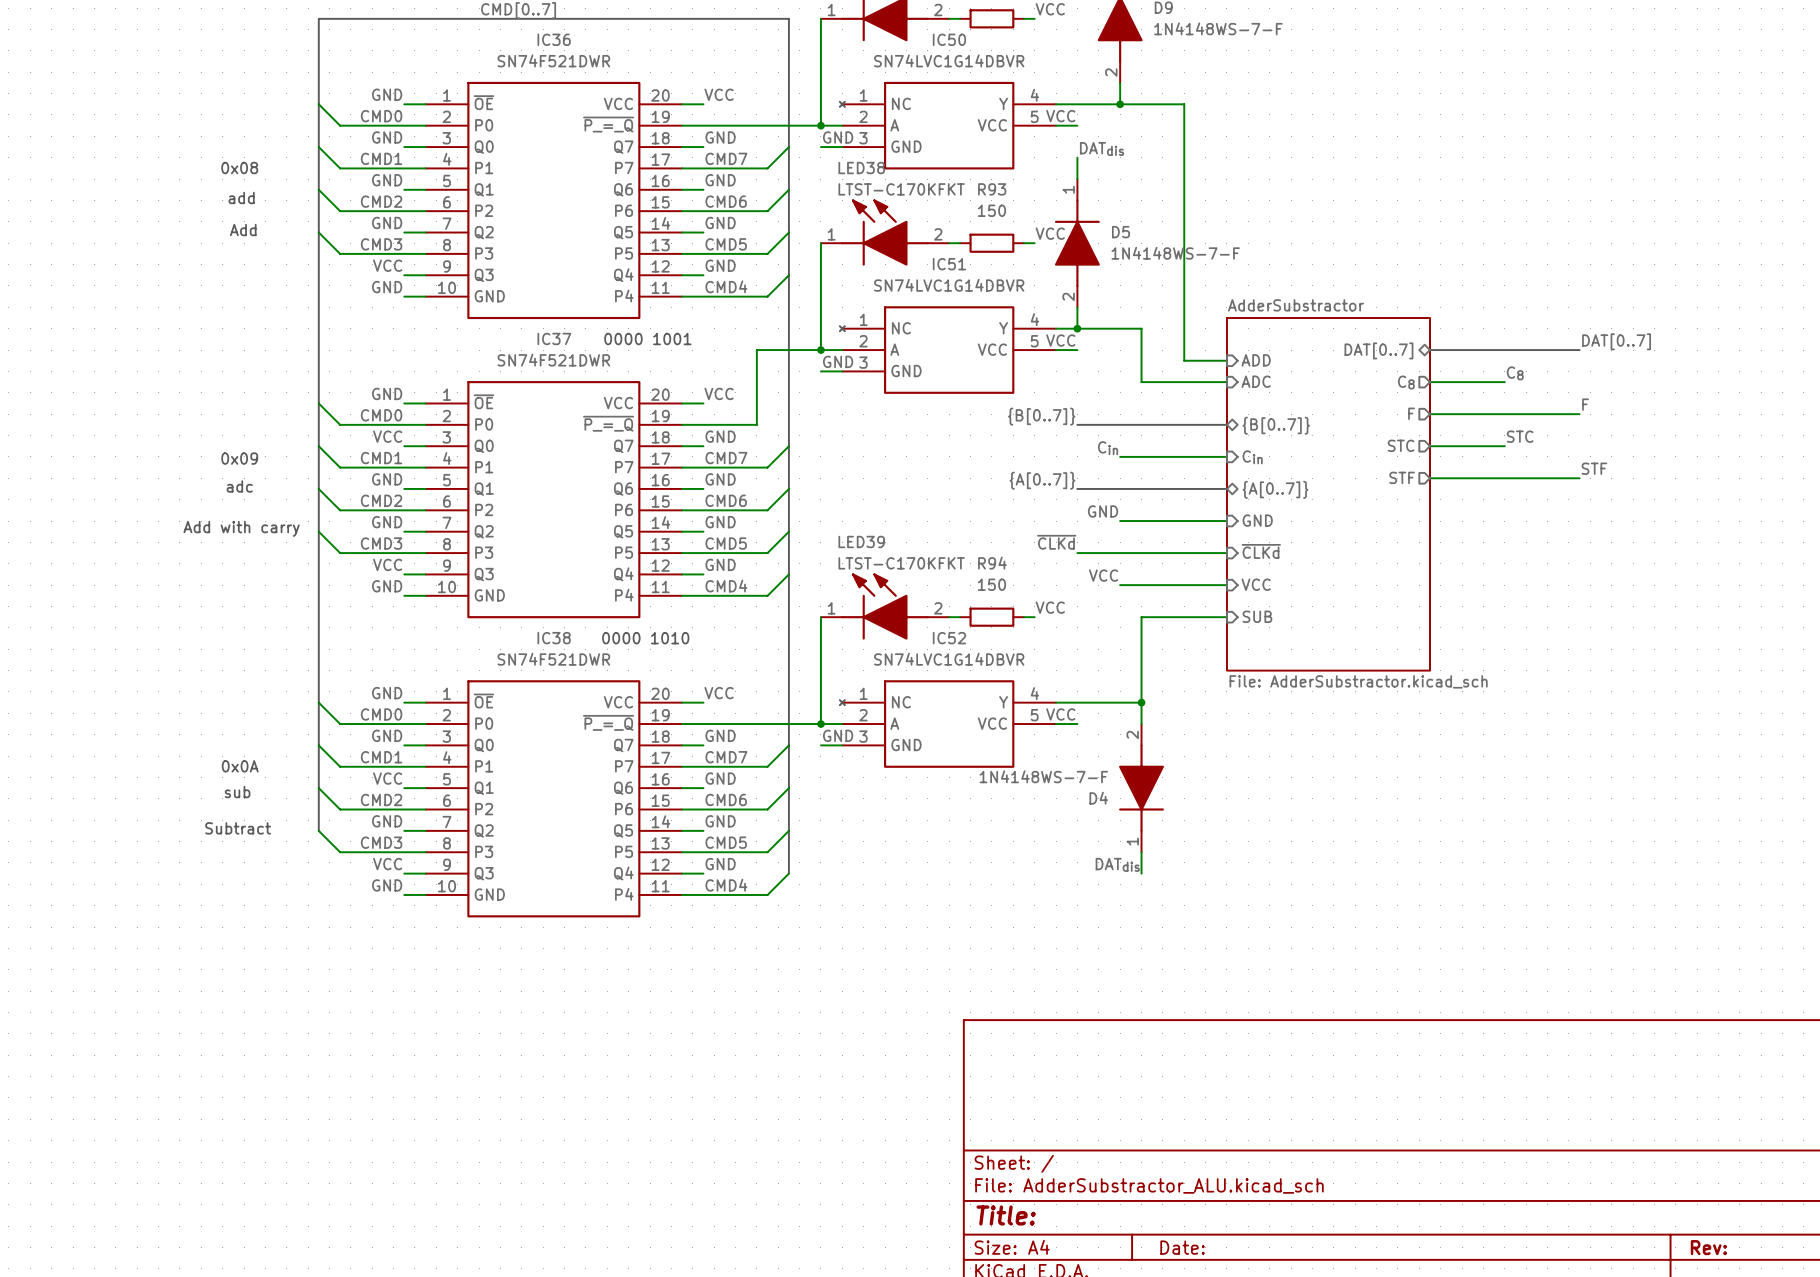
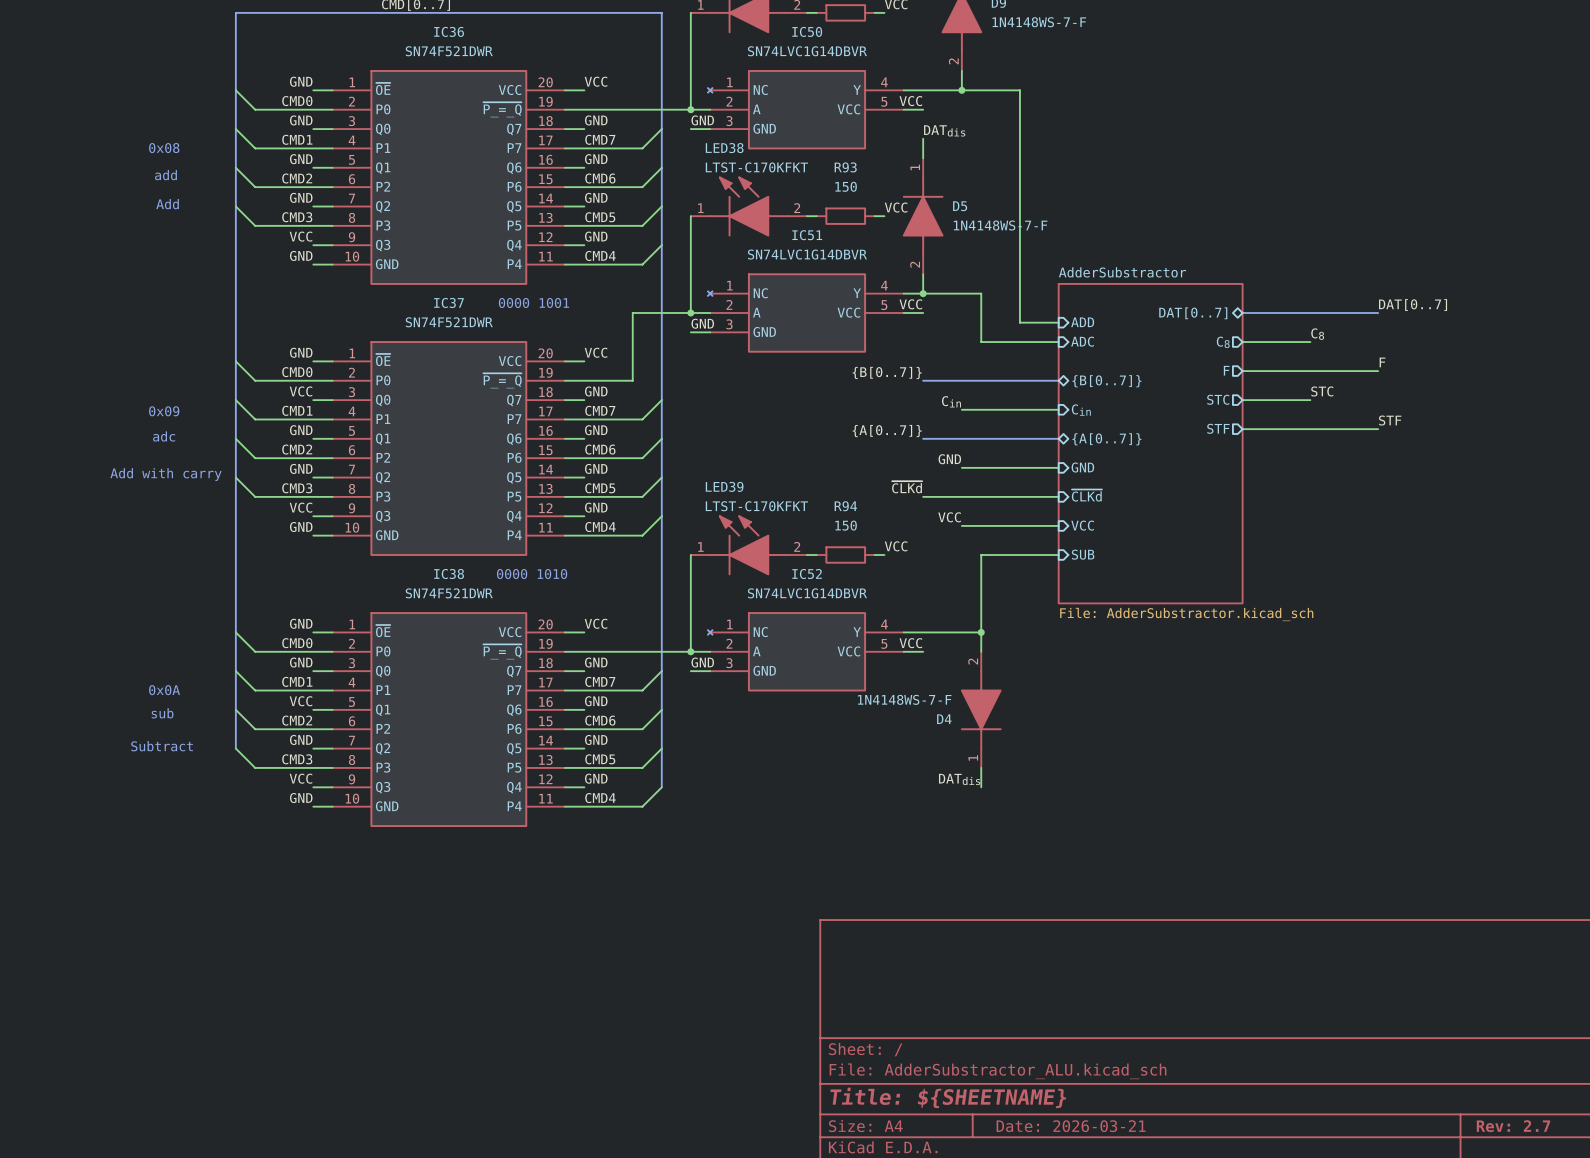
title block: Title: (1006, 1215) -> Title: ${SHEETNAME} (948, 1097)
title block: Date: (1182, 1247) -> Date: 2026-03-21 (1071, 1126)
title block: Rev: (1708, 1247) -> Rev: 2.7 (1513, 1126)

